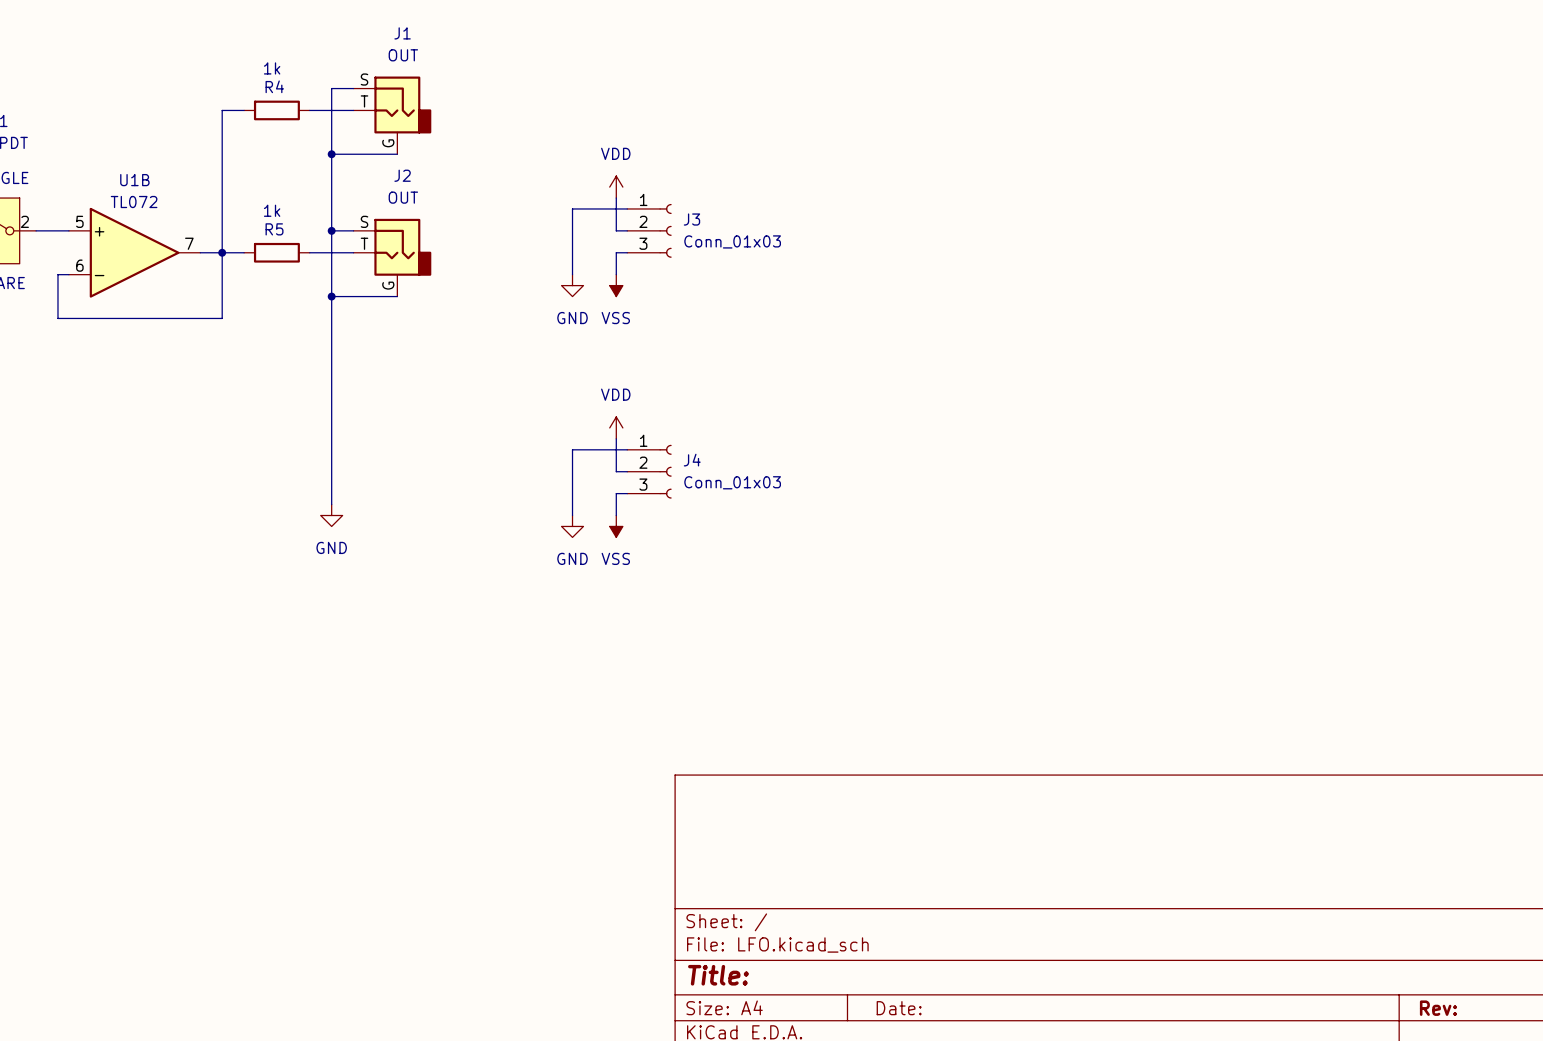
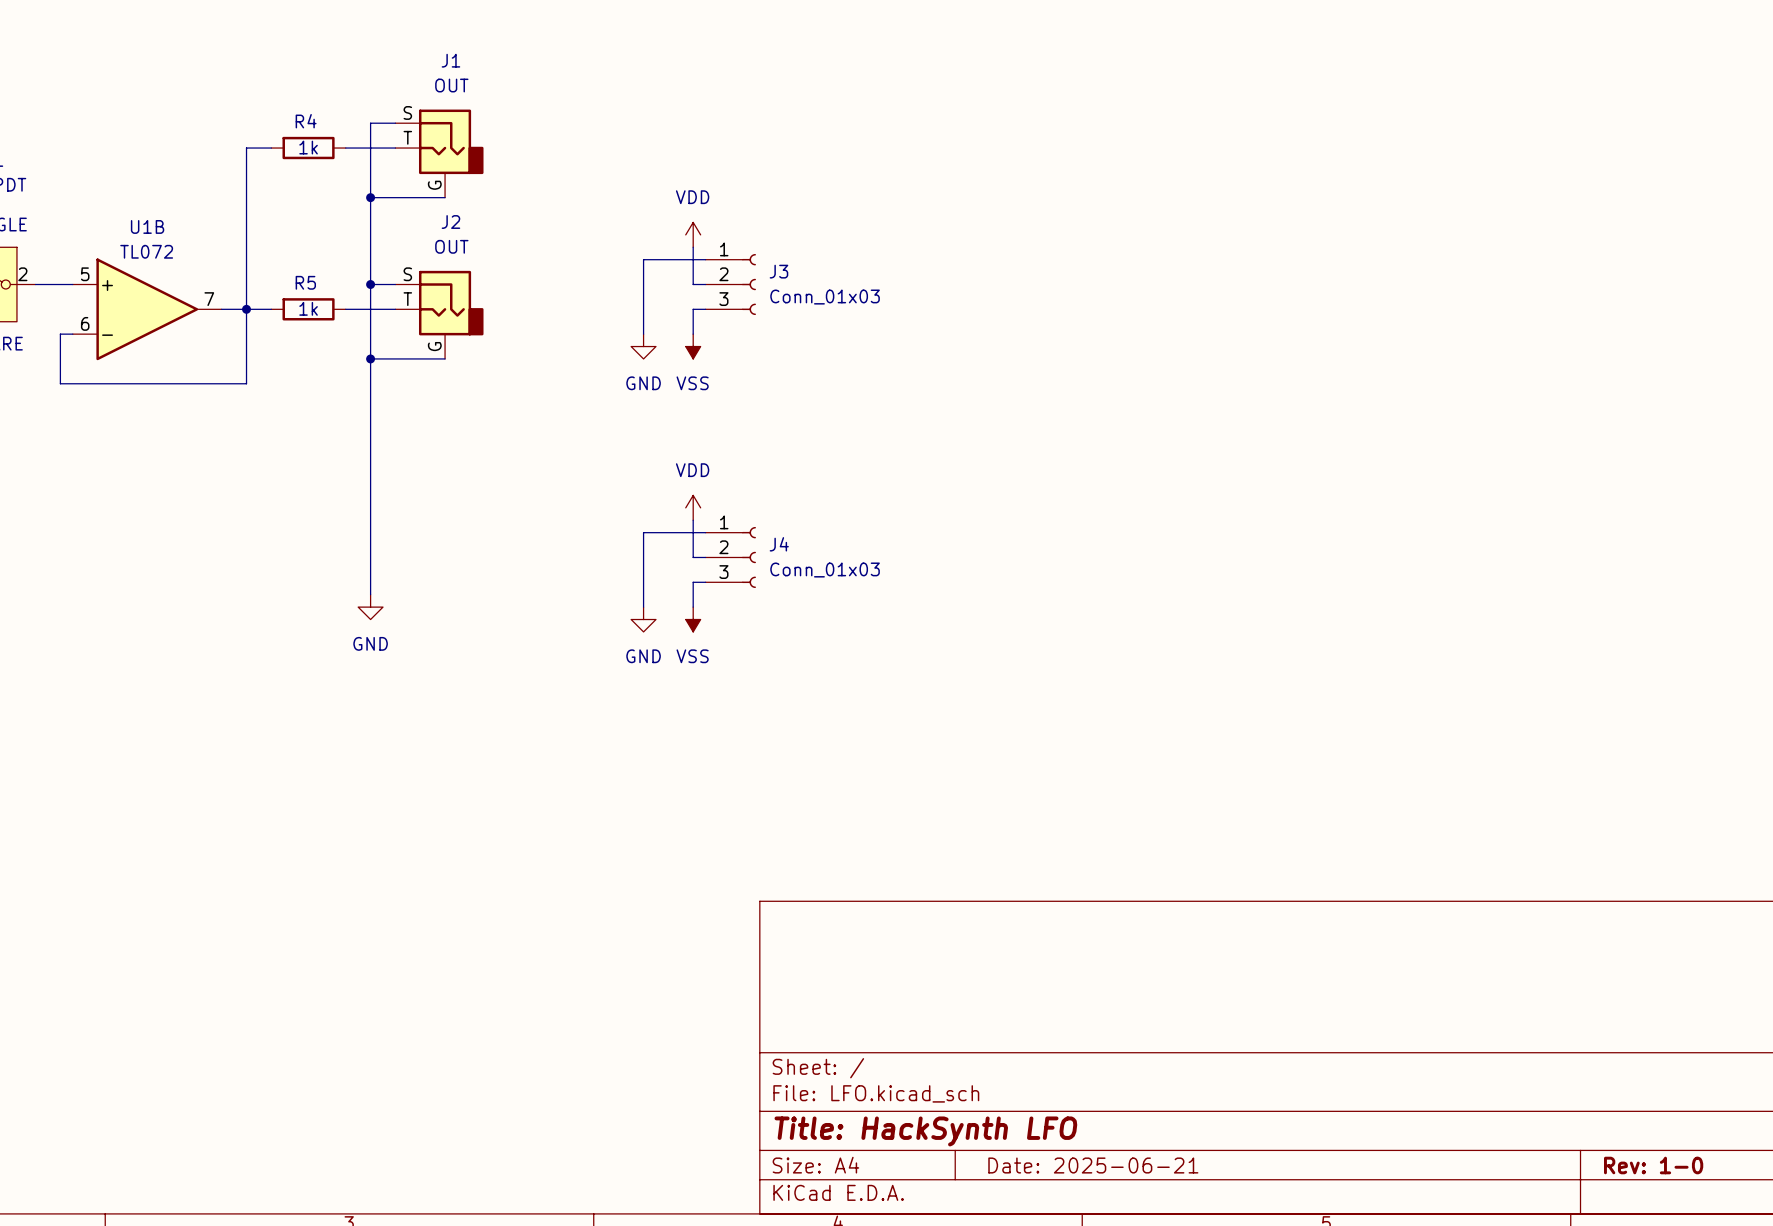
R4 value position: 1k (272, 68) -> 1k (308, 147)
R5 value position: 1k (272, 210) -> 1k (308, 308)
title block: Title: (718, 975) -> Title: HackSynth LFO (925, 1131)
title block: Date: (899, 1008) -> Date: 2025-06-21 (1093, 1165)
title block: Rev: (1438, 1008) -> Rev: 1-0 (1653, 1165)

